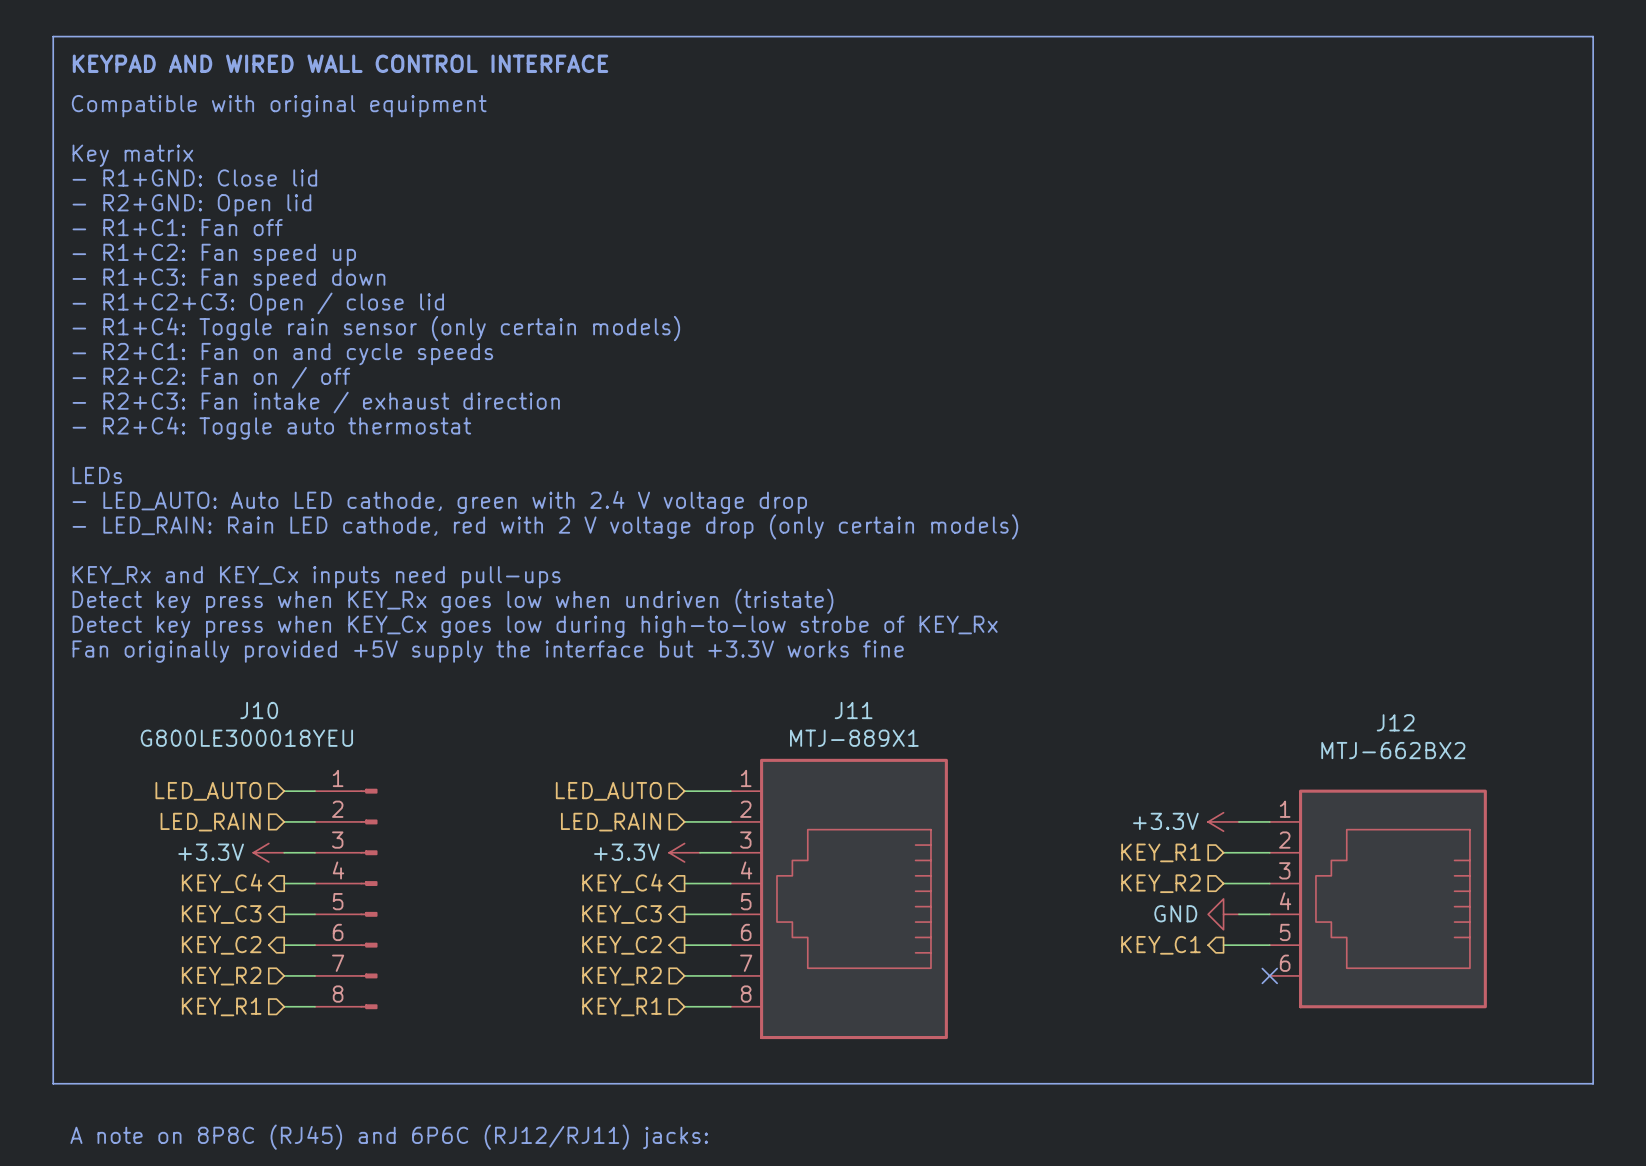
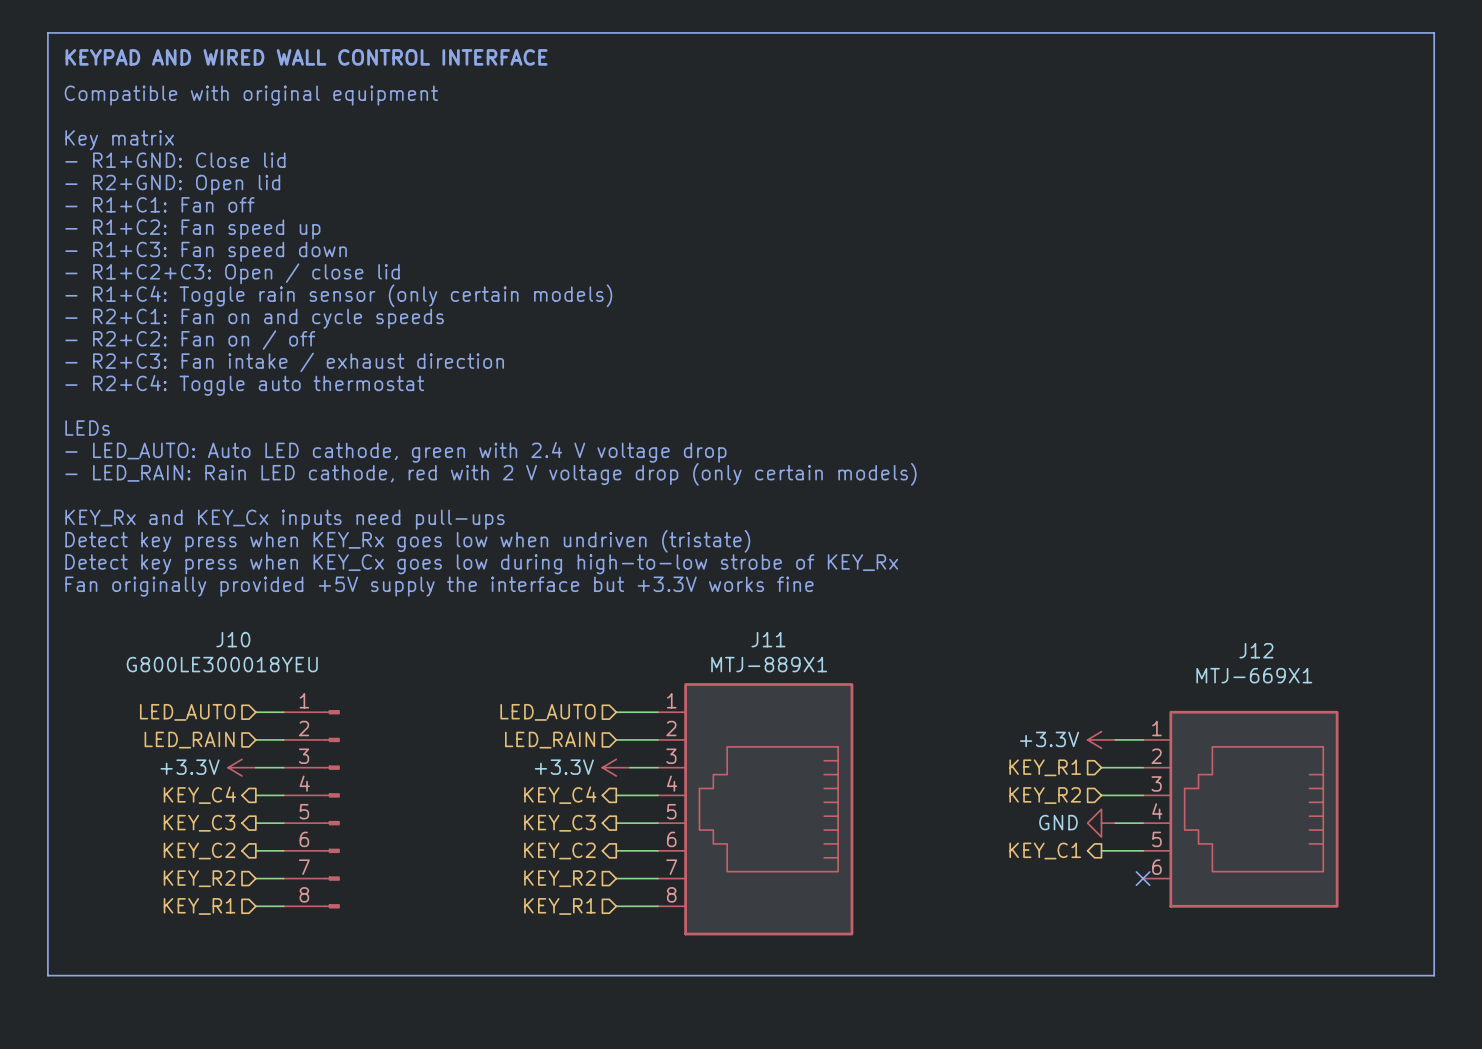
J12 value: MTJ-662BX2 (1393, 750) -> MTJ-669X1 (1254, 675)
text: A note on 8P8C (RJ45) and 6P6C (RJ12/RJ11) jacks: (389, 1137) -> none

